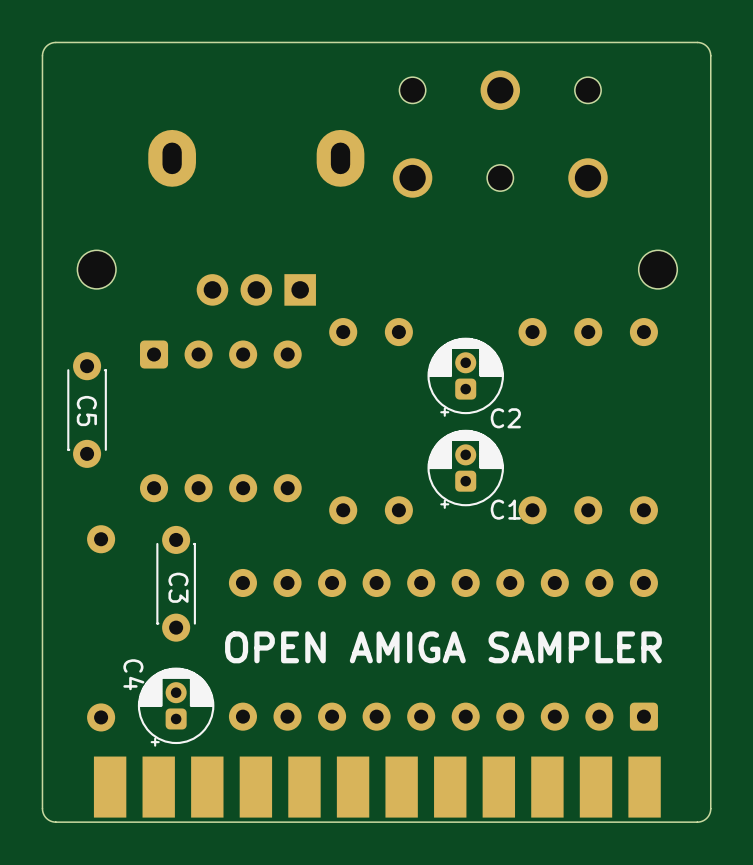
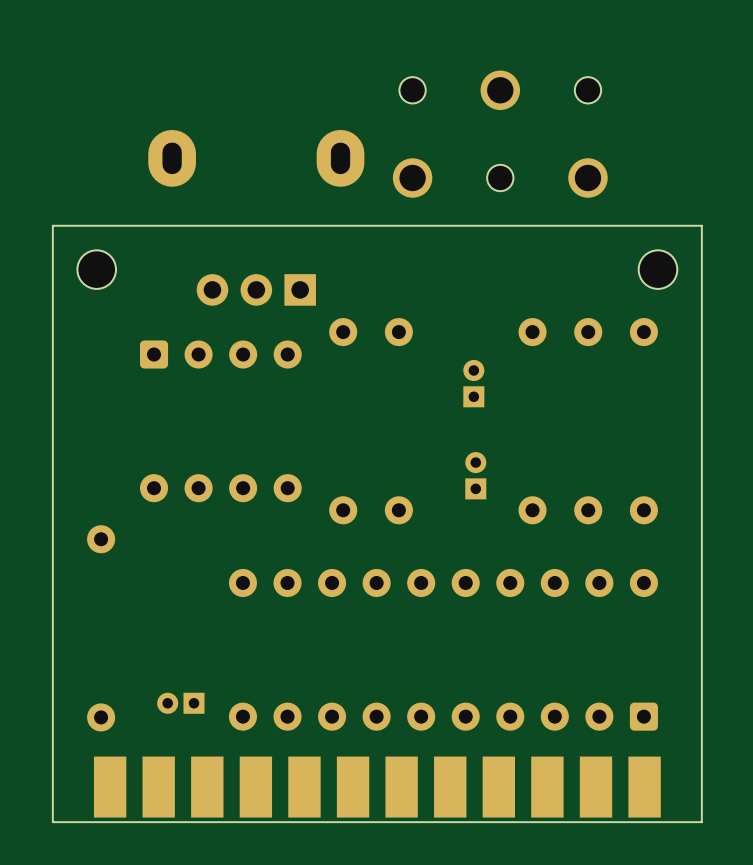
C2: (465, 377) -> none
part: none -> (473, 383)
C5: (87, 410) -> none
C1: (465, 469) -> none
part: none -> (475, 475)
C3: (176, 583) -> none
text: OPEN AMIGA SAMPLER (443, 647) -> none
part: none -> (180, 703)
C4: (176, 707) -> none
board edge: (697, 822) (706, 818) (710, 808) (710, 55) (706, 46) (697, 42) (55, 42) (45, 47) (42, 55) (42, 808) (46, 818) (55, 822) -> (697, 822) (701, 822) (701, 225) (52, 225) (52, 822) (55, 822)

